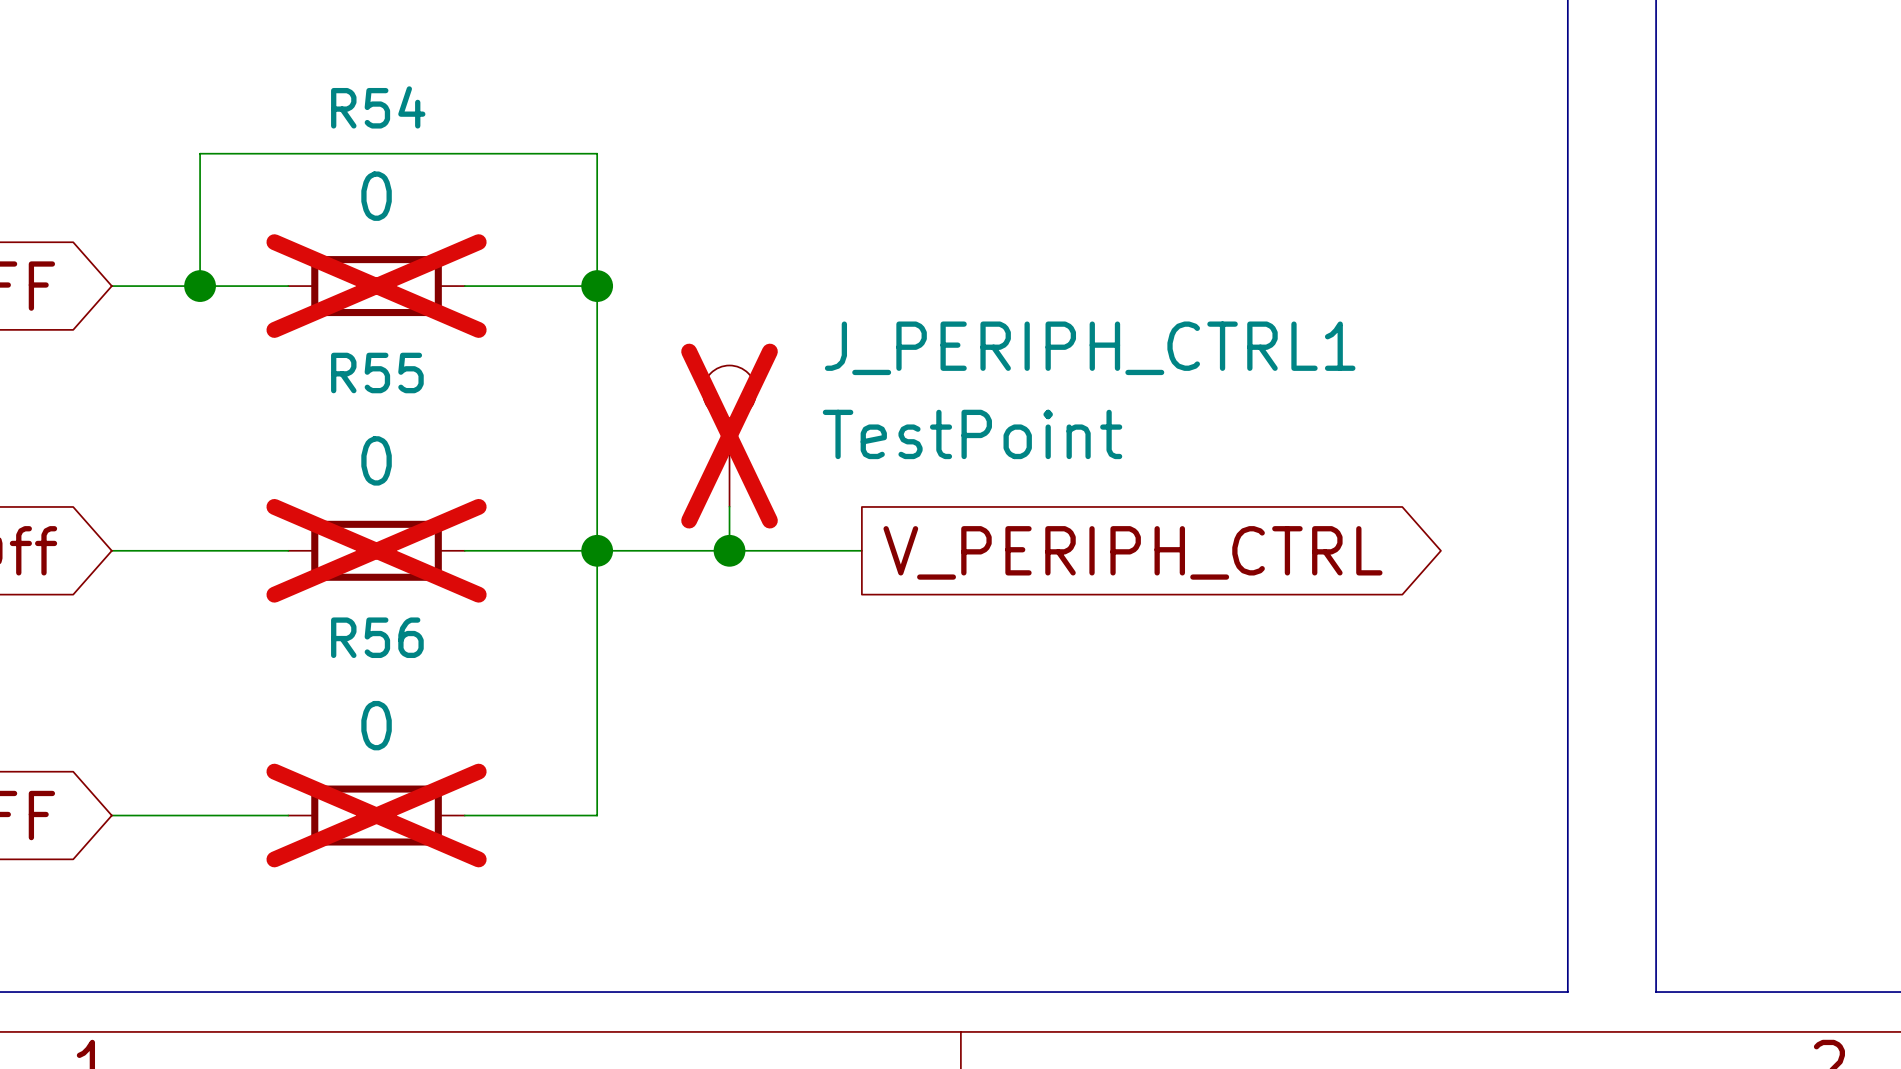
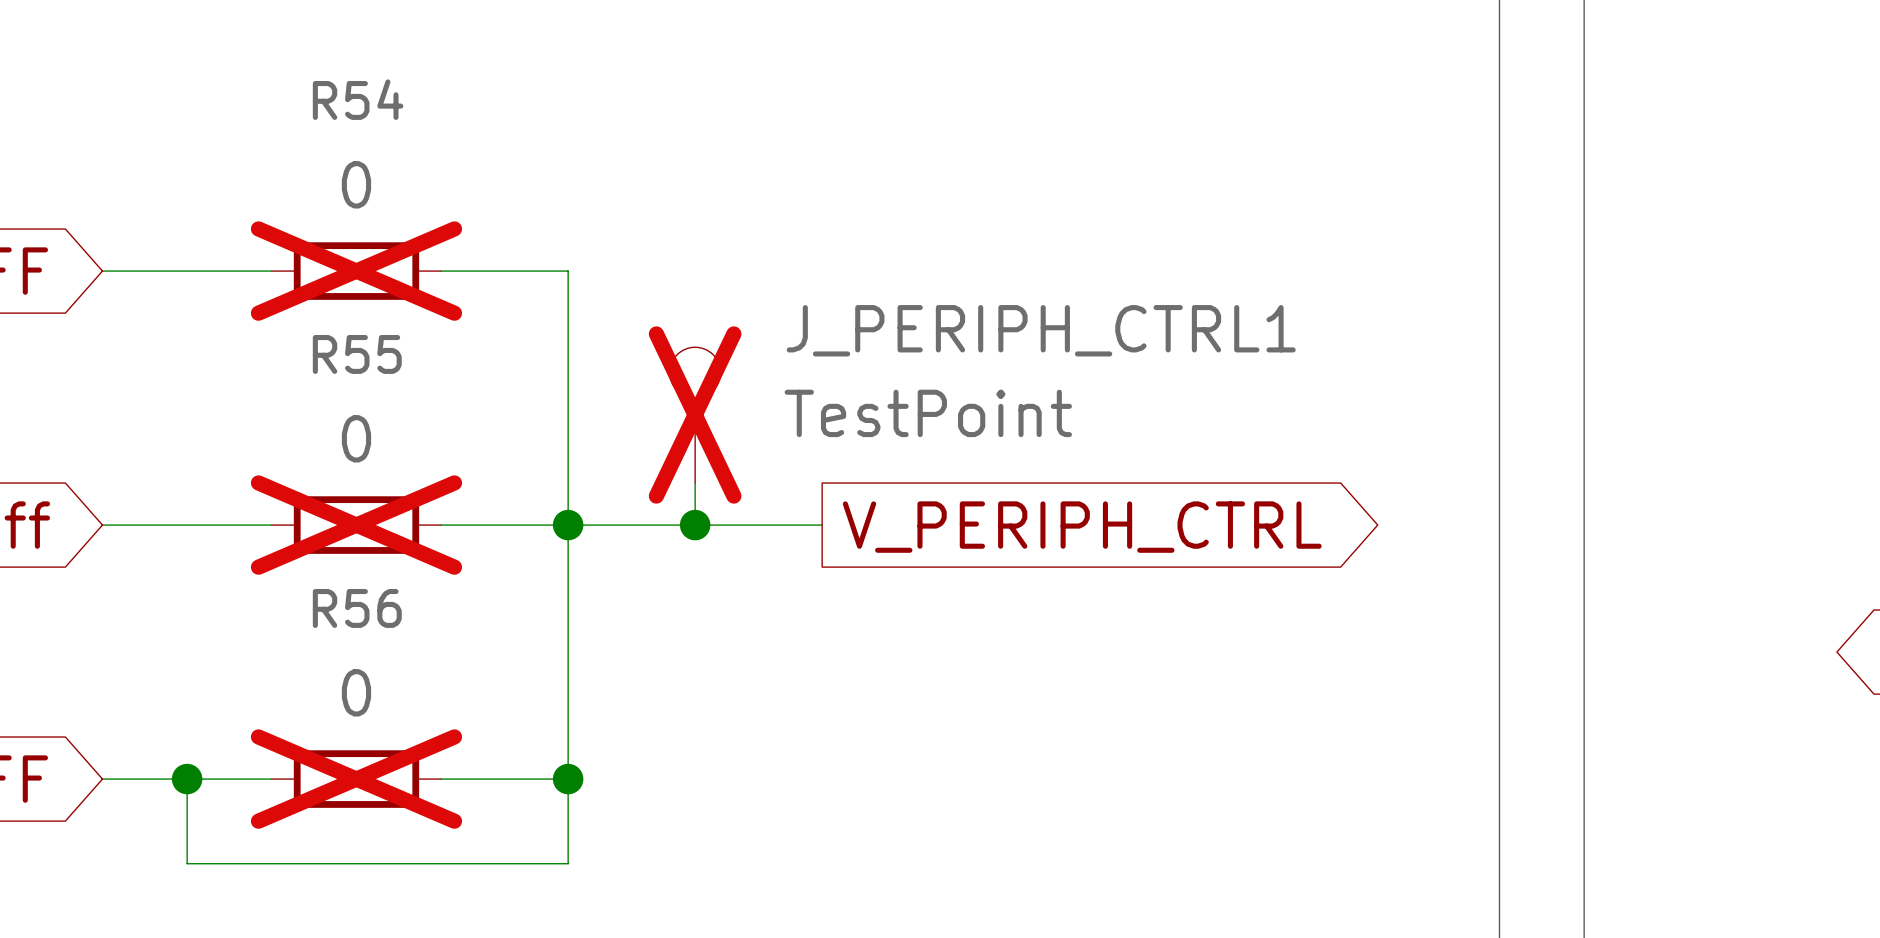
wire: (200, 286) (200, 153) (597, 153) (597, 286) -> none
junction: (200, 286) -> none
junction: (597, 286) -> none
wire: none -> (187, 779) (187, 863) (568, 863) (568, 779)
junction: none -> (187, 779)
junction: none -> (568, 779)

